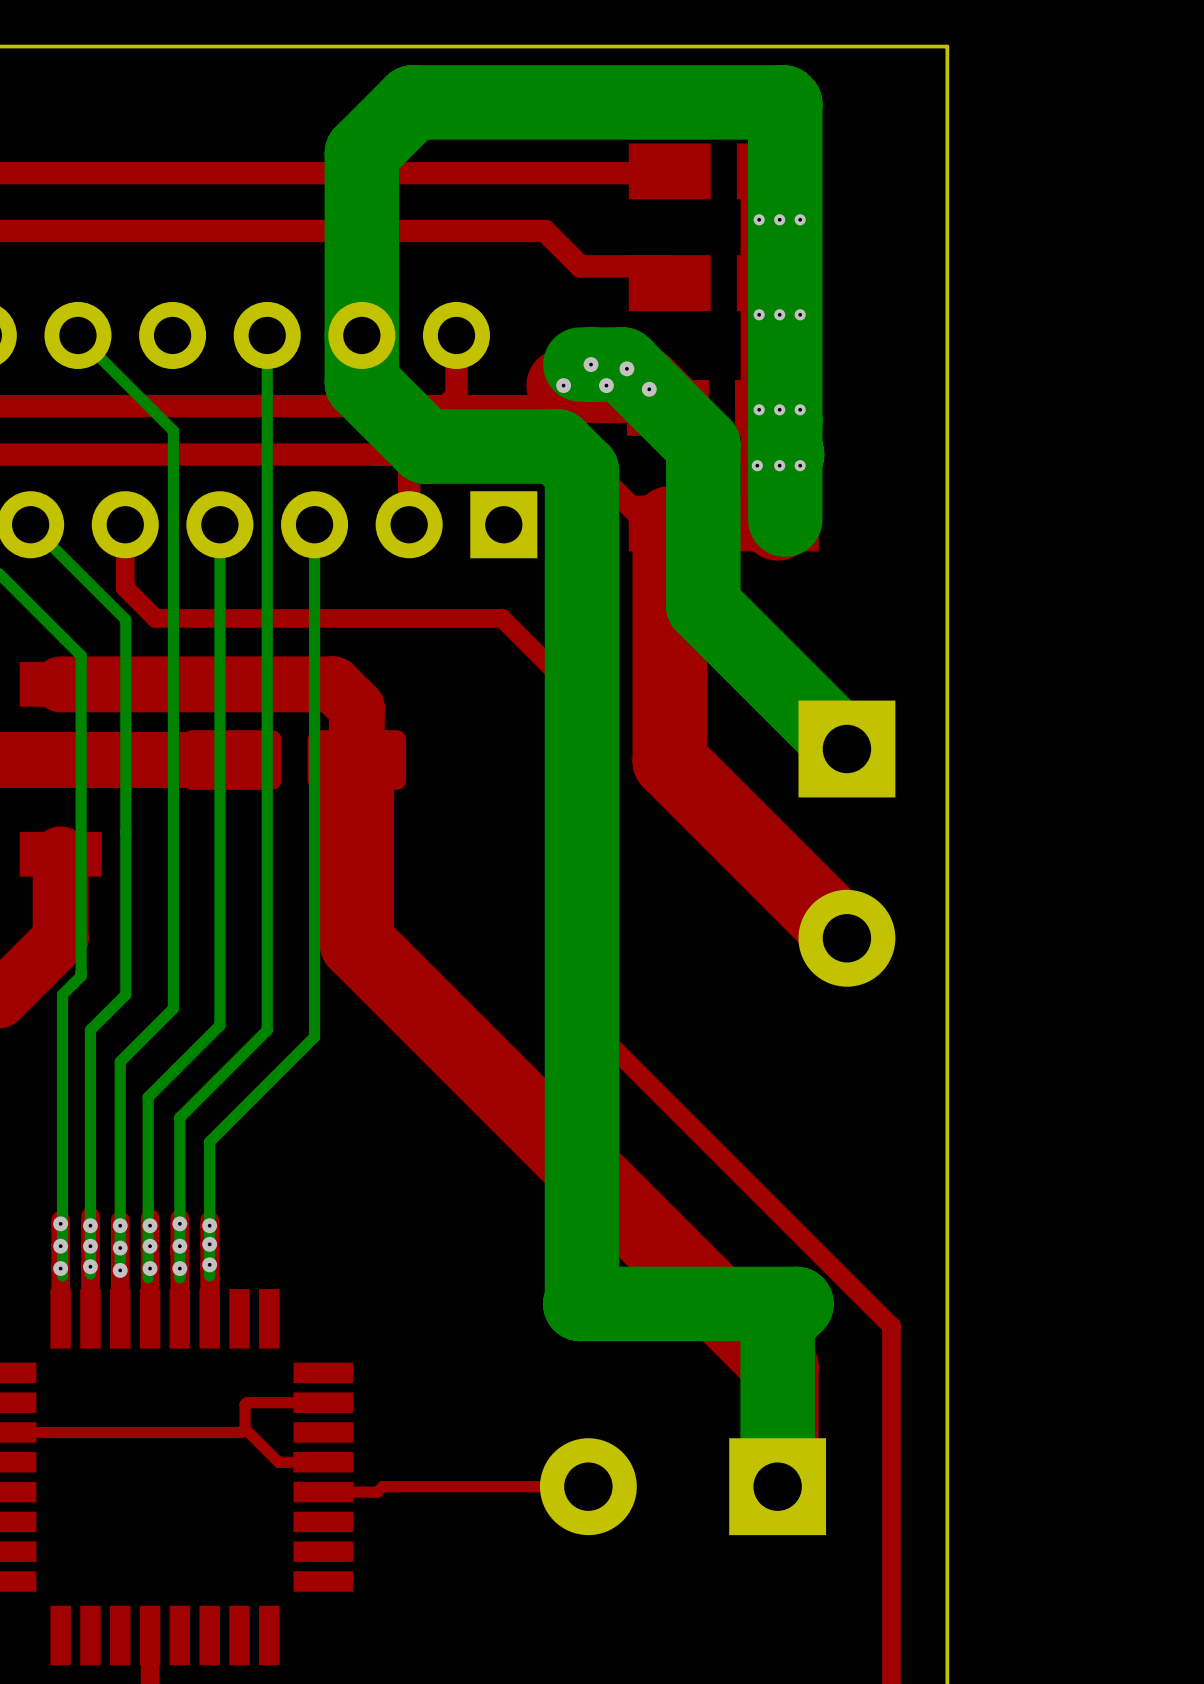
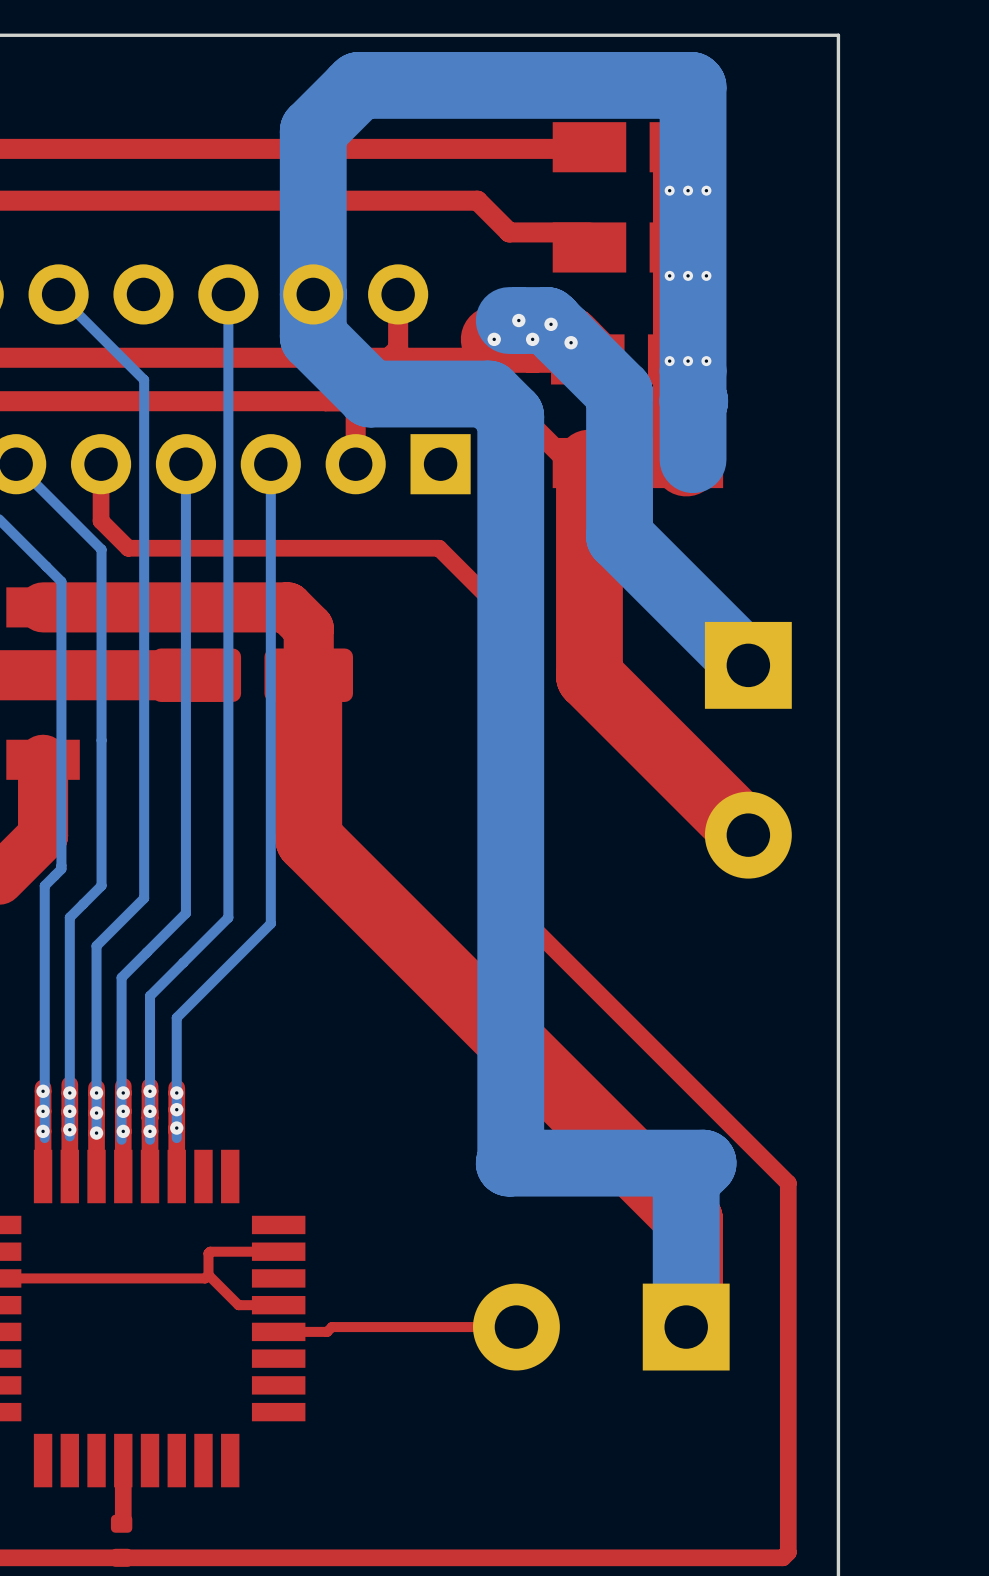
via: (757, 465) -> none
via: (779, 465) -> none
via: (800, 465) -> none

